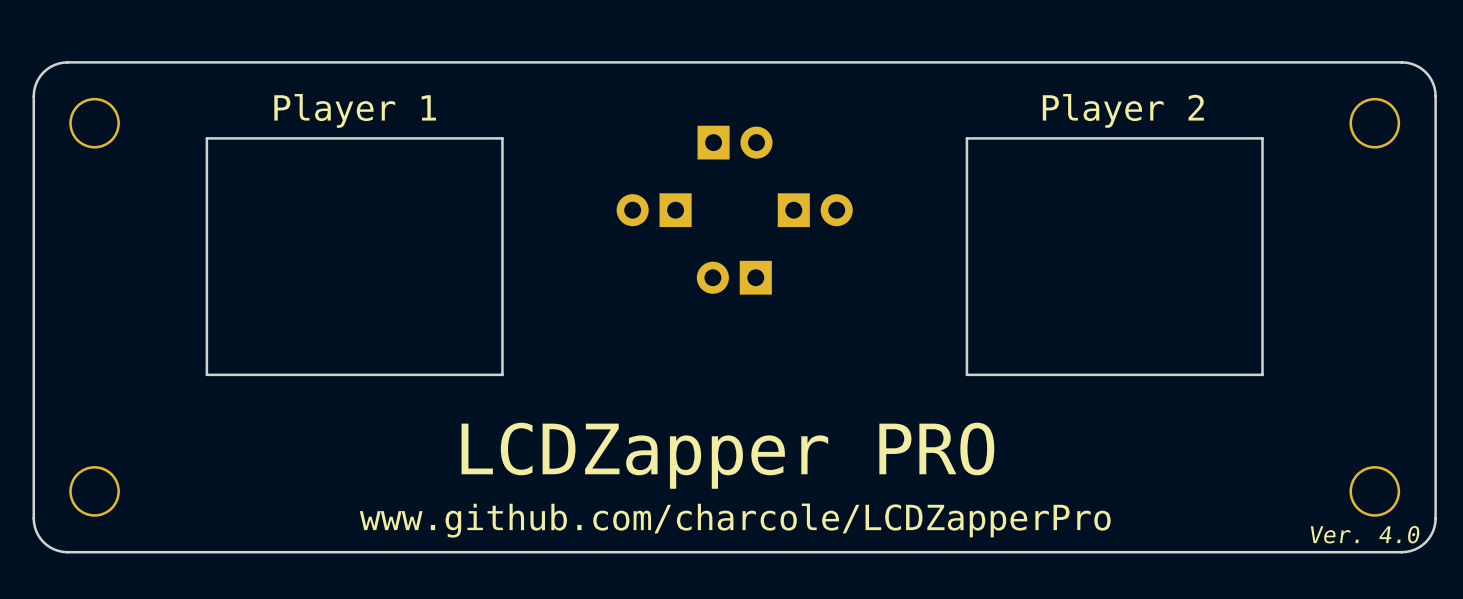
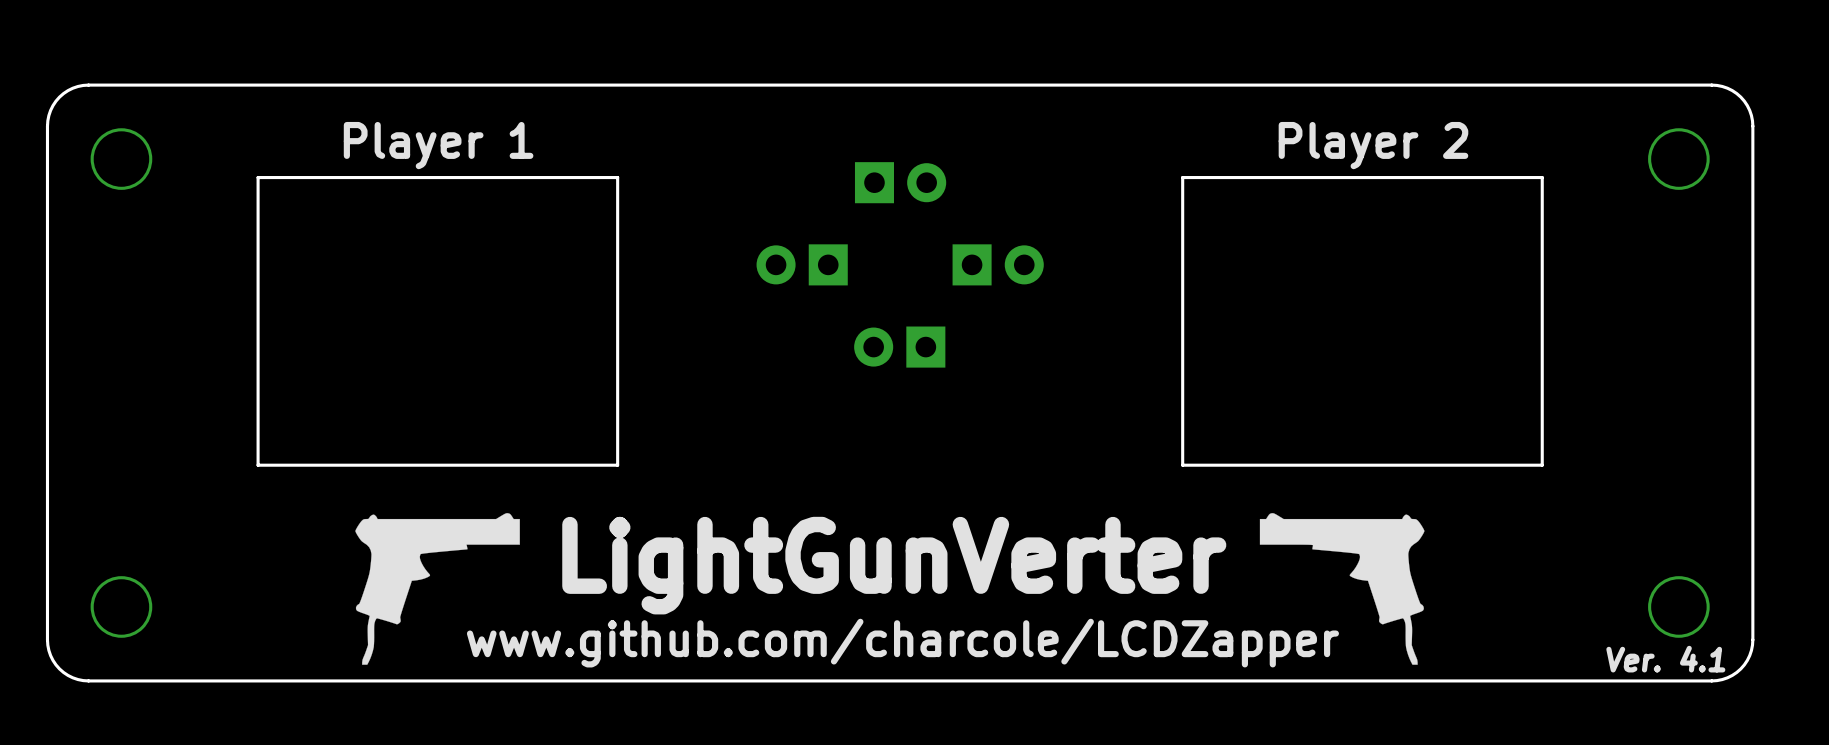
drawing: none -> [355, 513, 520, 665]
drawing: none -> [1259, 513, 1425, 665]
text: LCDZapper PRO (727, 455) -> LightGunVerter (894, 565)
text: www.github.com/charcole/LCDZapperPro (735, 520) -> www.github.com/charcole/LCDZapper (902, 643)
text: Ver. 4.0 (1365, 534) -> Ver. 4.1 (1665, 659)

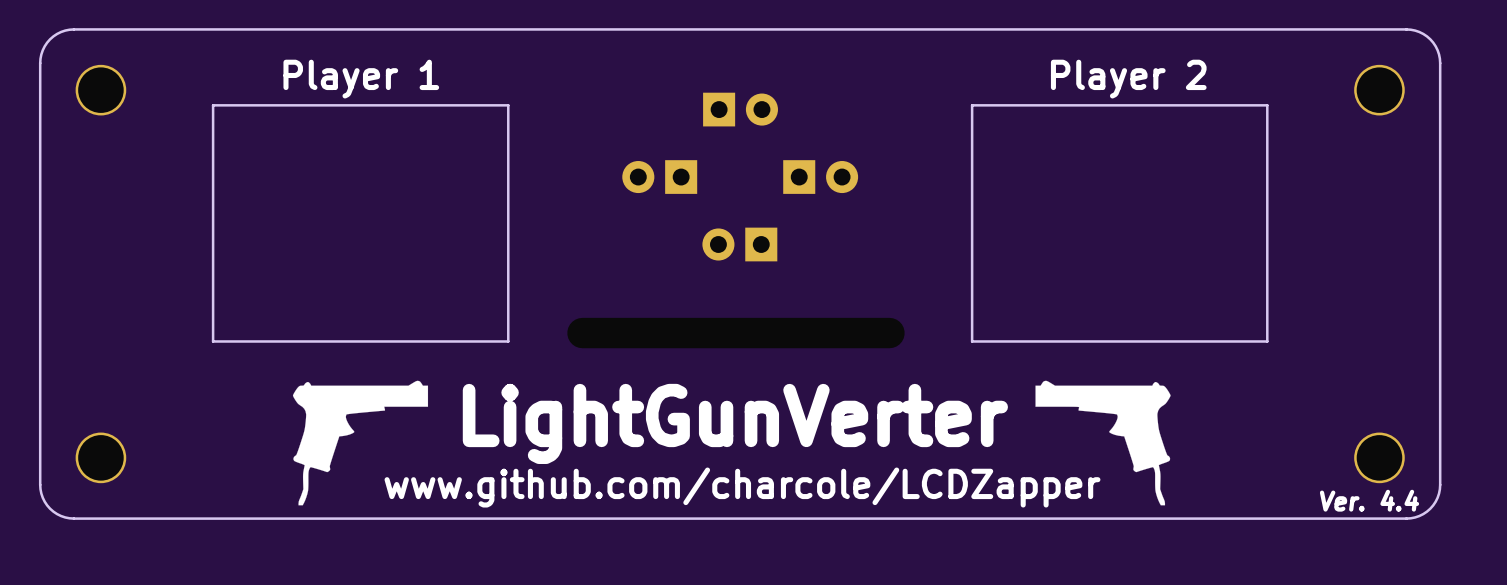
text: Ver. 4.1 (1665, 659) -> Ver. 4.4 (1369, 500)

